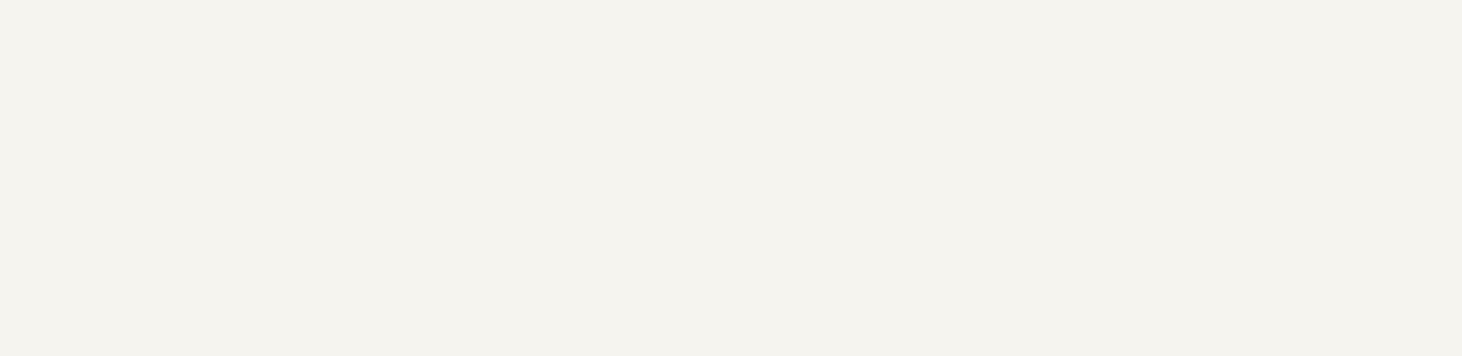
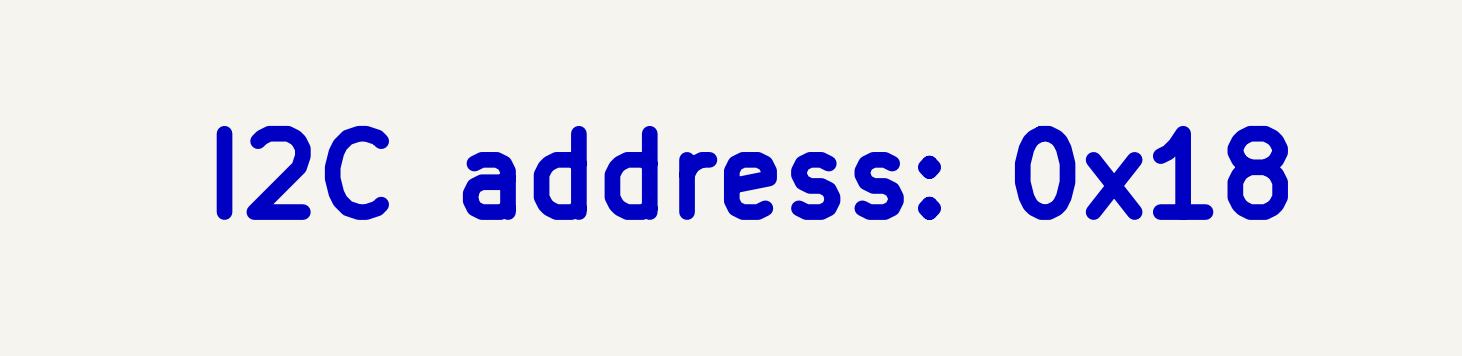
text: none -> I2C address: 0x18 (752, 172)

